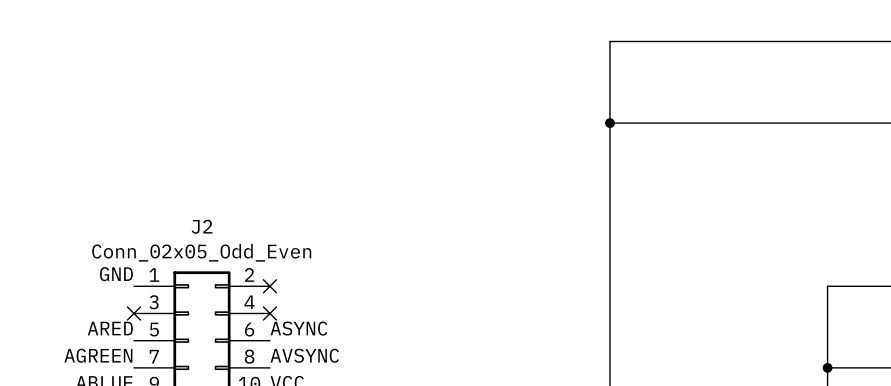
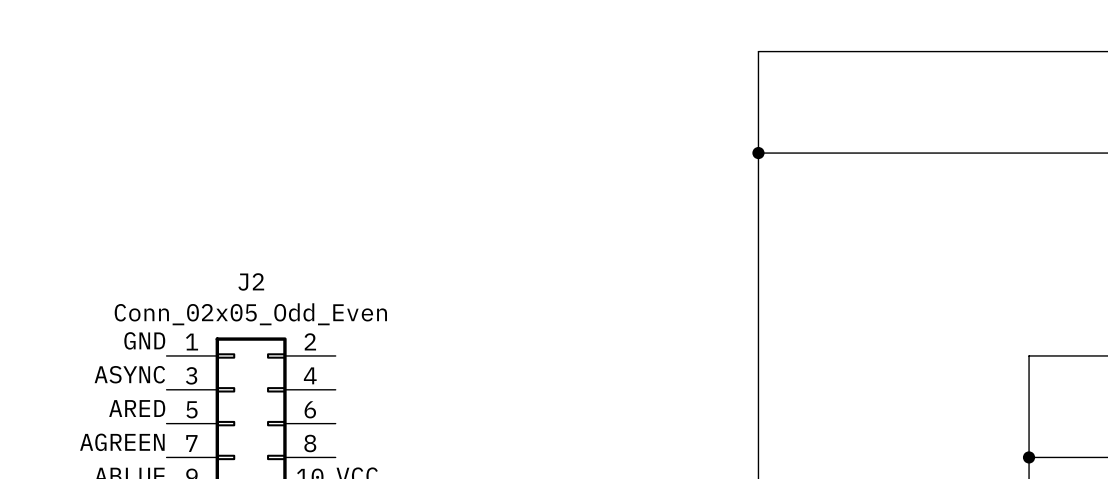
no-connect mark: (269, 286) -> none
no-connect mark: (133, 313) -> none
no-connect mark: (269, 313) -> none
label position: ASYNC (298, 328) -> ASYNC (129, 374)
label: AVSYNC (304, 355) -> none

